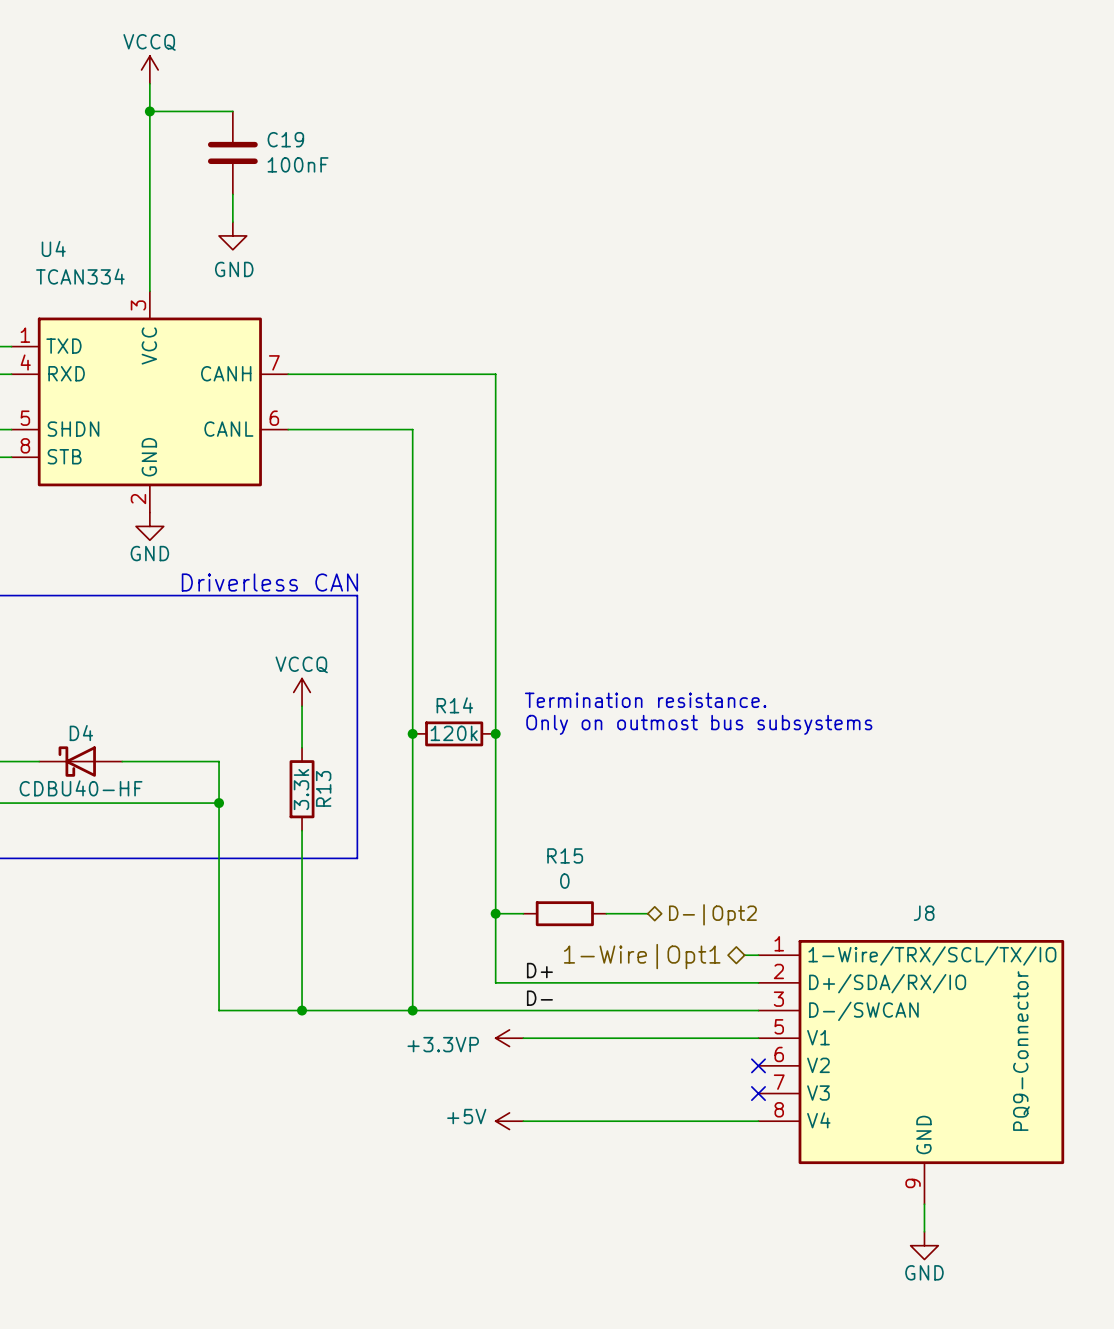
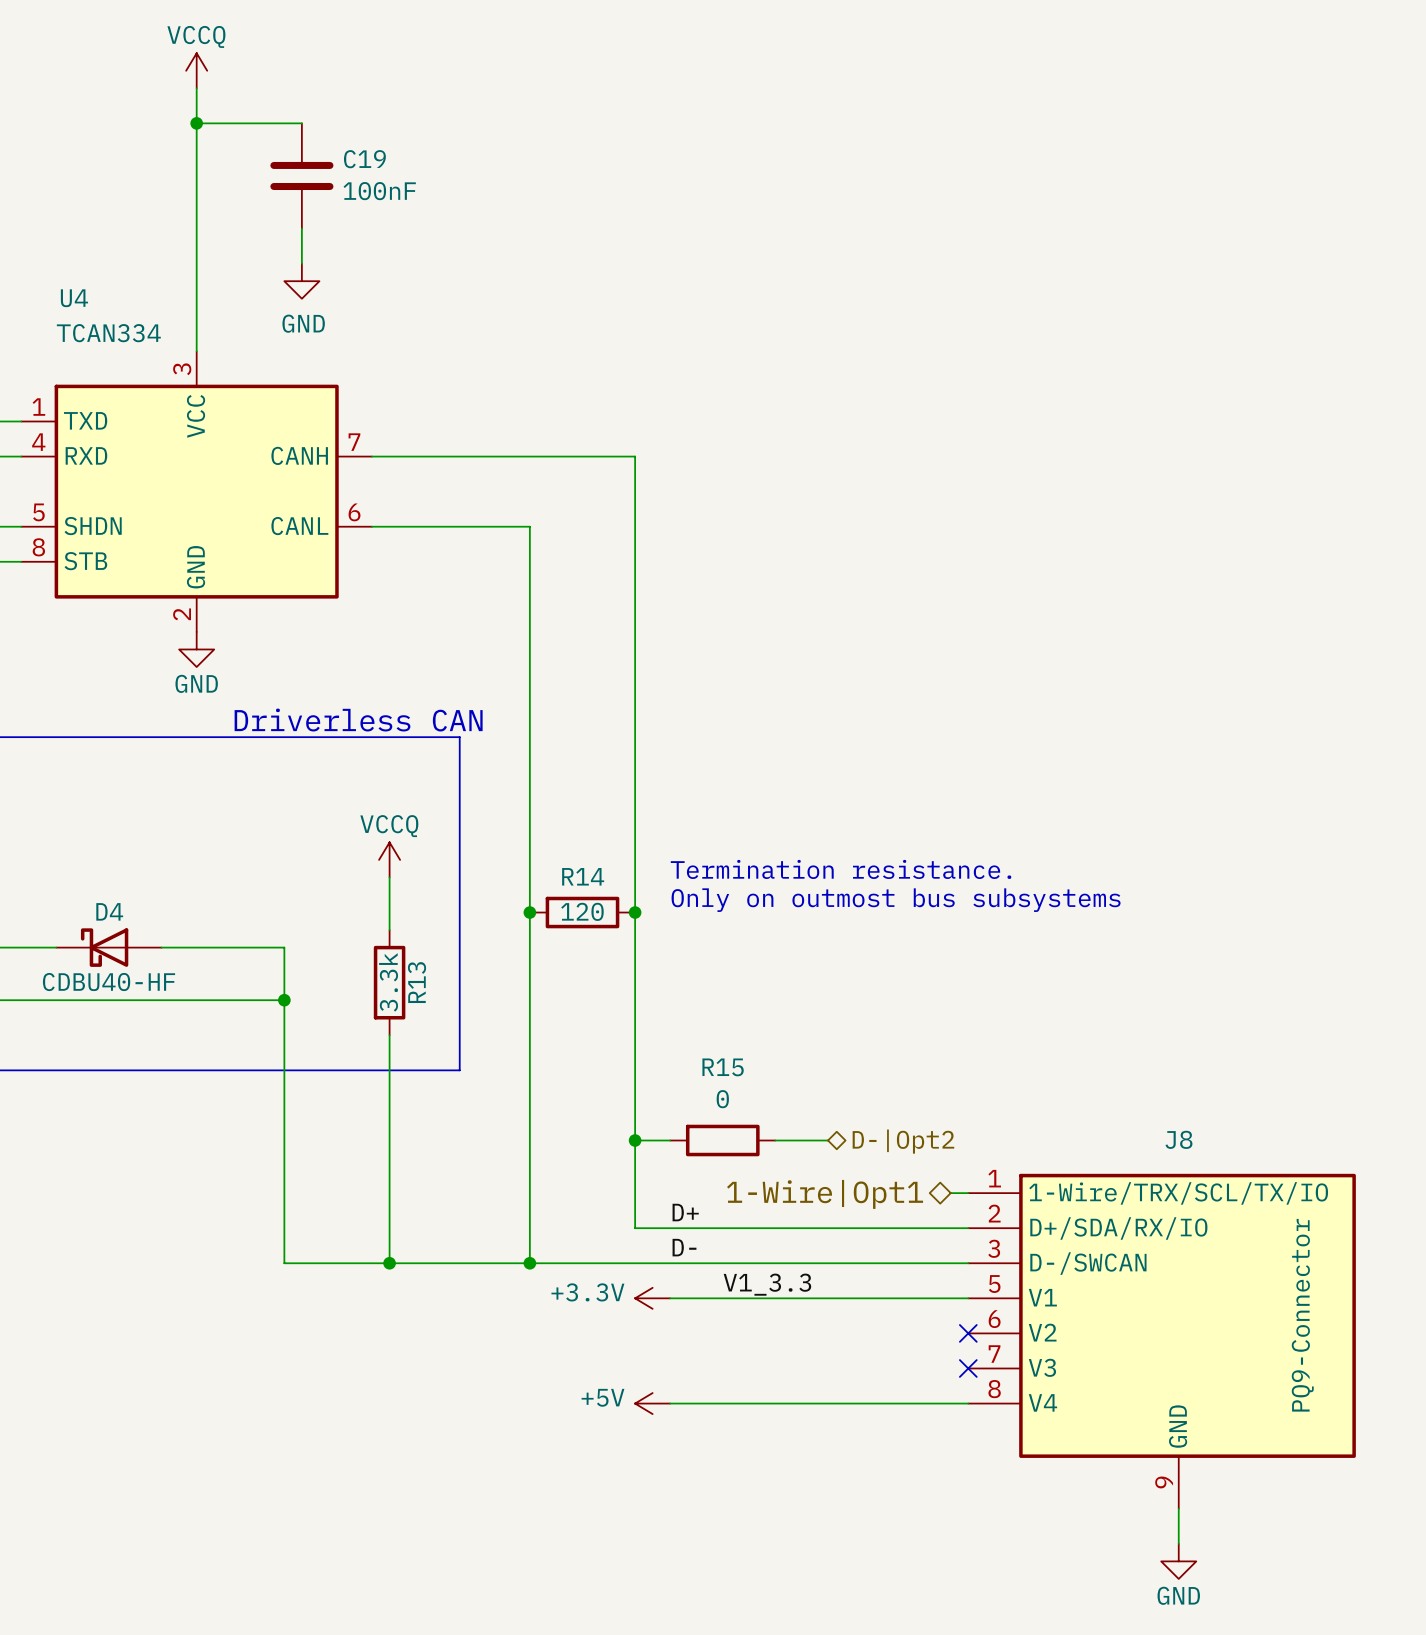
R14 value: 120k (454, 733) -> 120 (582, 911)
label: none -> V1_3.3 (767, 1284)
power symbol: +3.3VP (509, 1038) -> +3.3V (652, 1298)

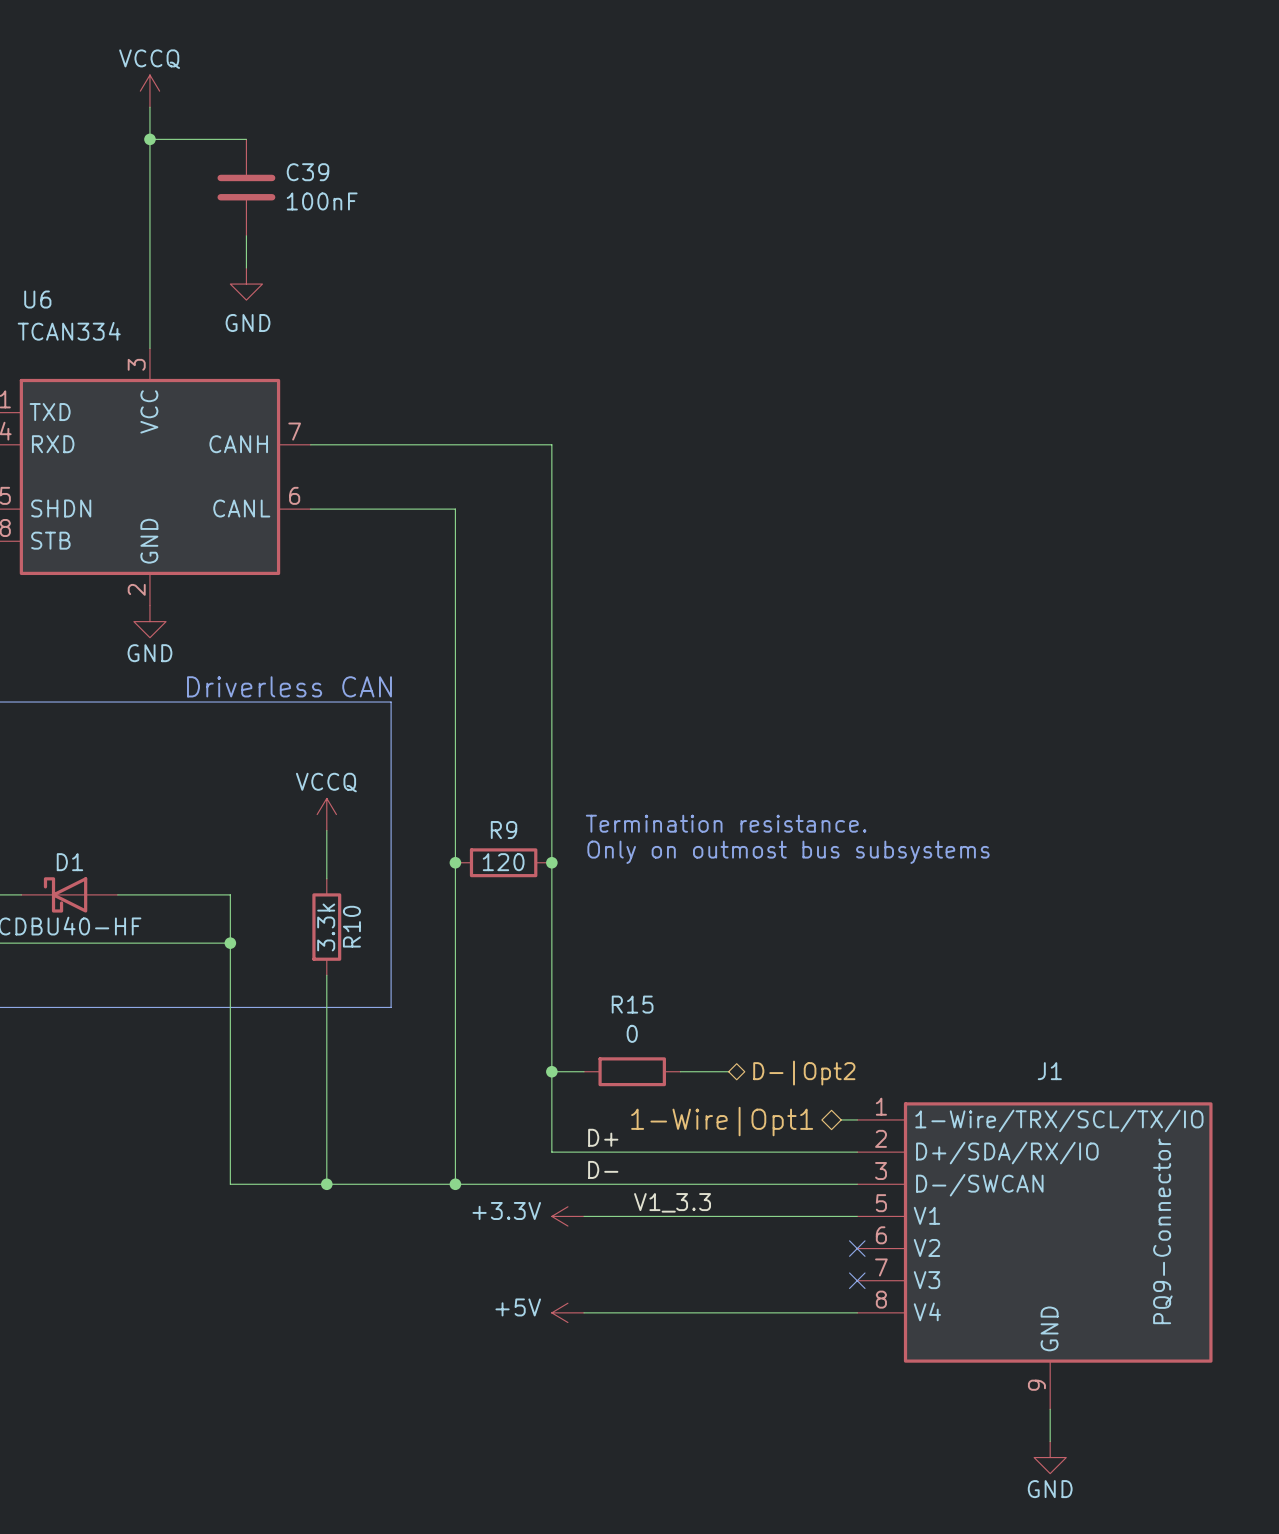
C19 name: C19 (364, 159) -> C39 (308, 172)
U4 name: U4 (74, 298) -> U6 (37, 299)
R14 name: R14 (583, 876) -> R9 (504, 830)
D4 name: D4 (109, 911) -> D1 (69, 862)
R13 name: R13 (416, 982) -> R10 (351, 926)
J8 name: J8 (1178, 1139) -> J1 (1049, 1071)

